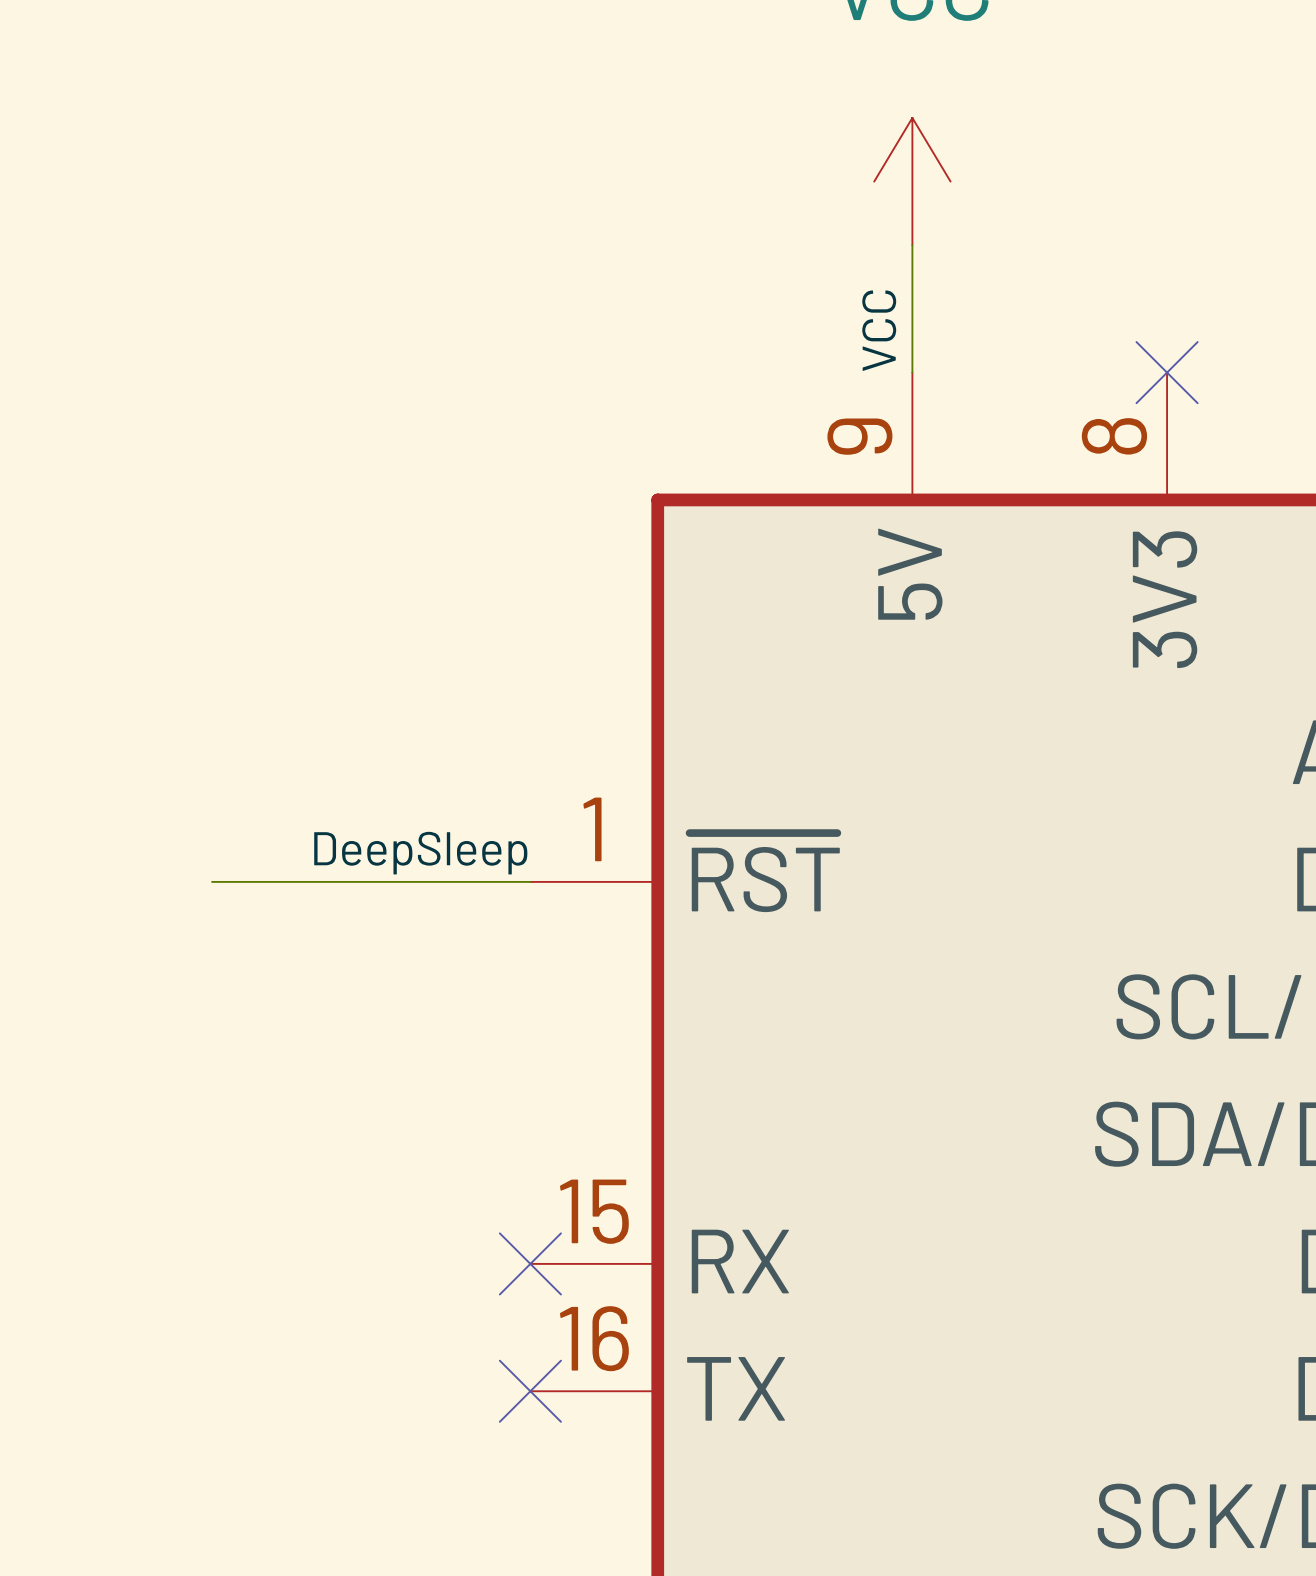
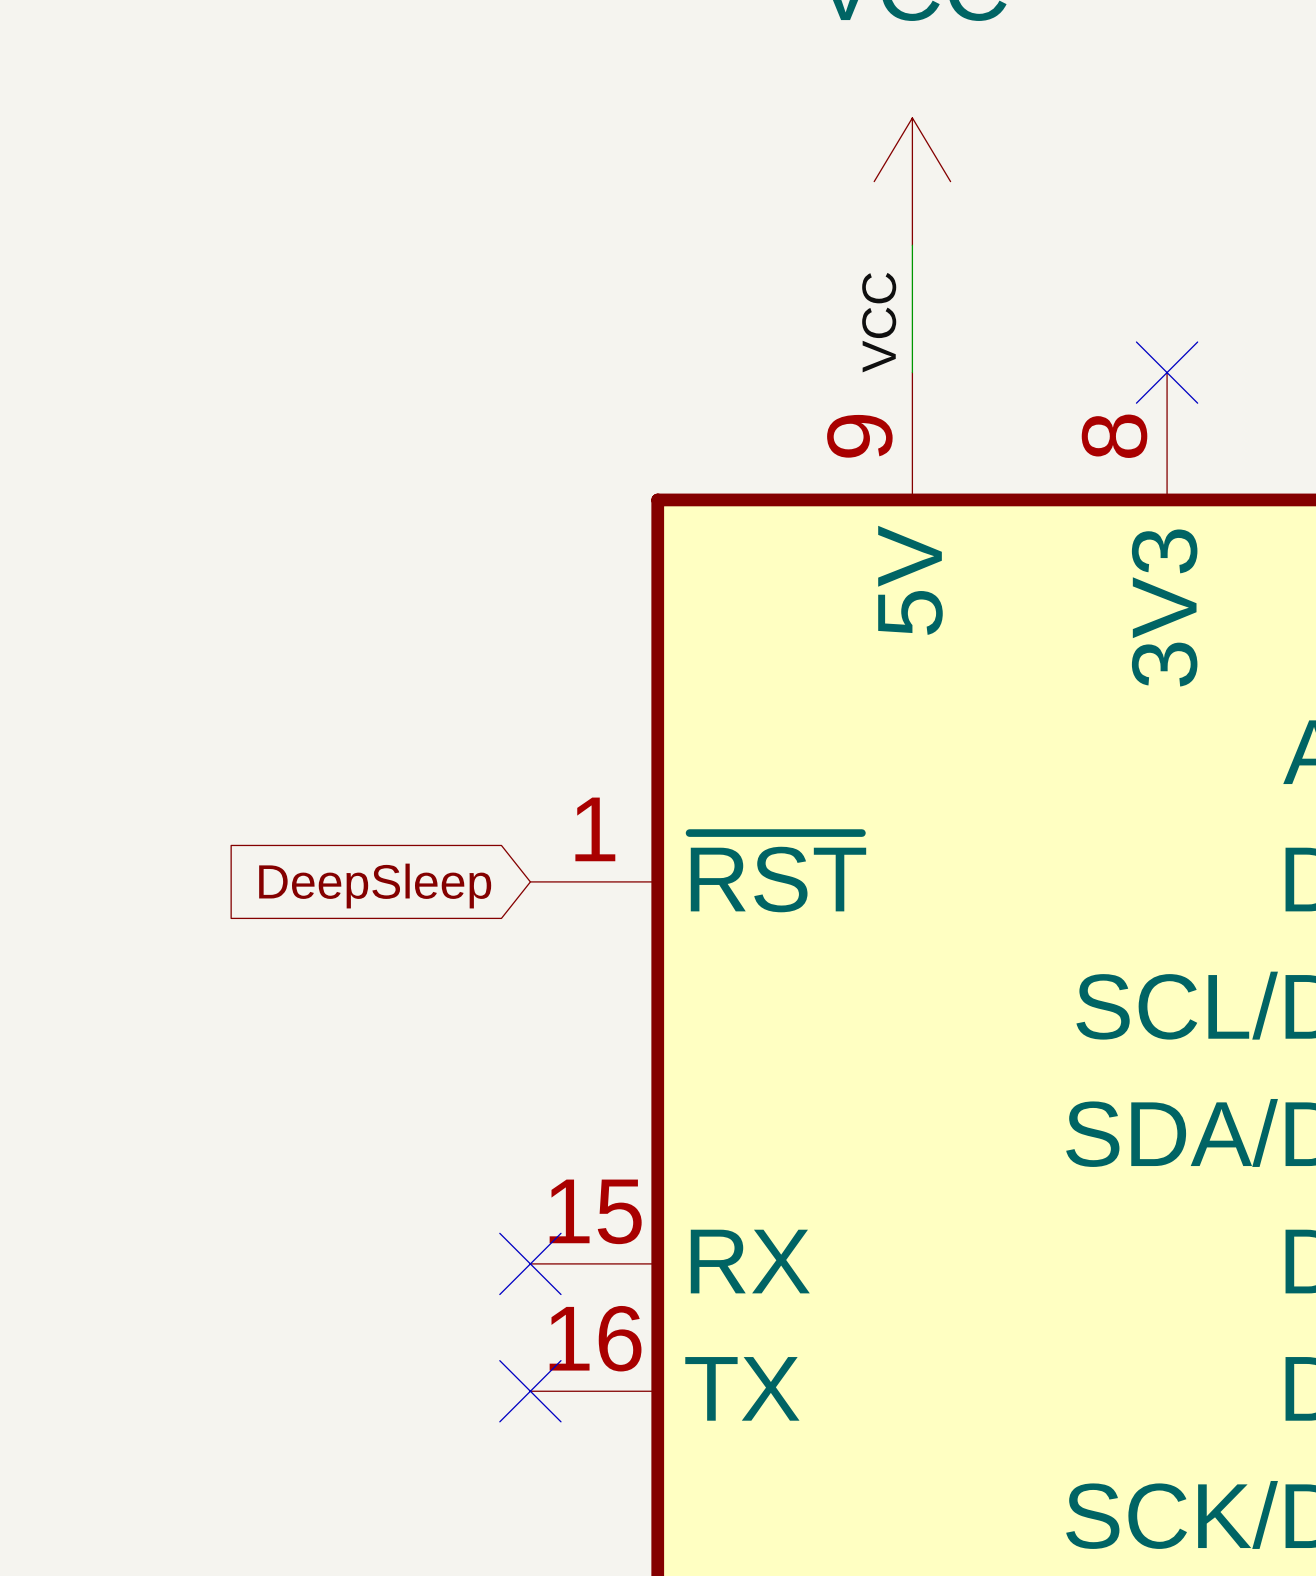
label: DeepSleep (420, 853) -> none
wire: (212, 881) (530, 881) -> none
global label: none -> DeepSleep (375, 886)

